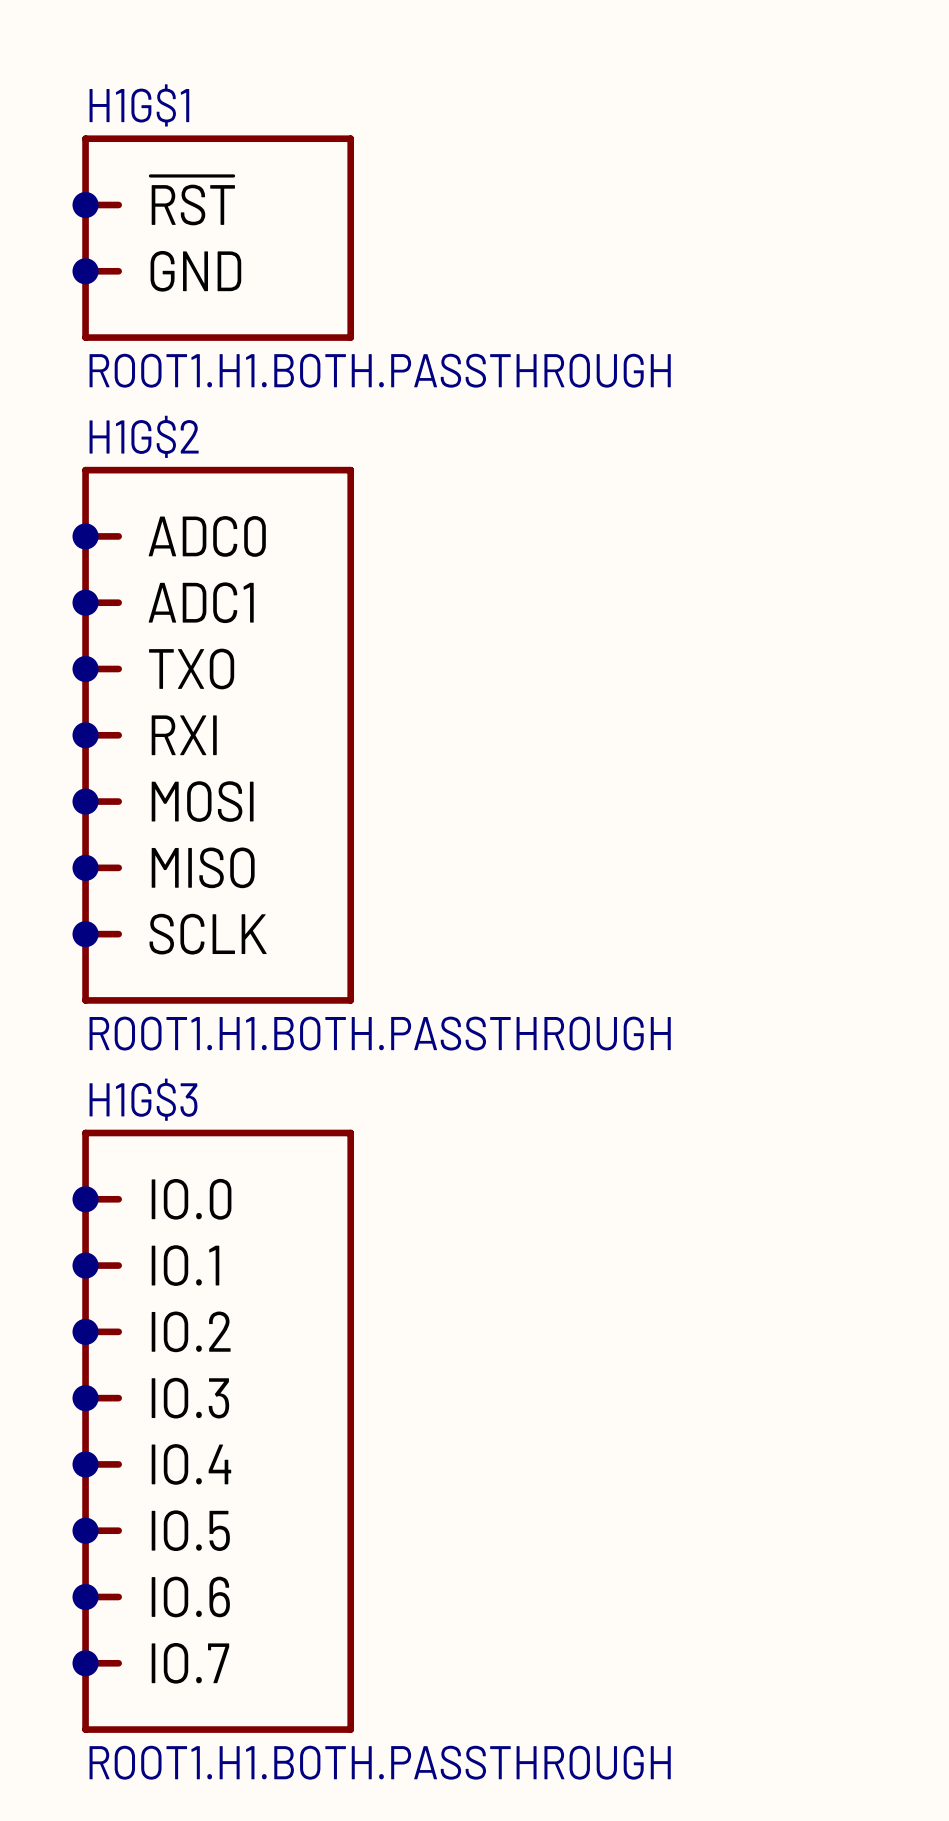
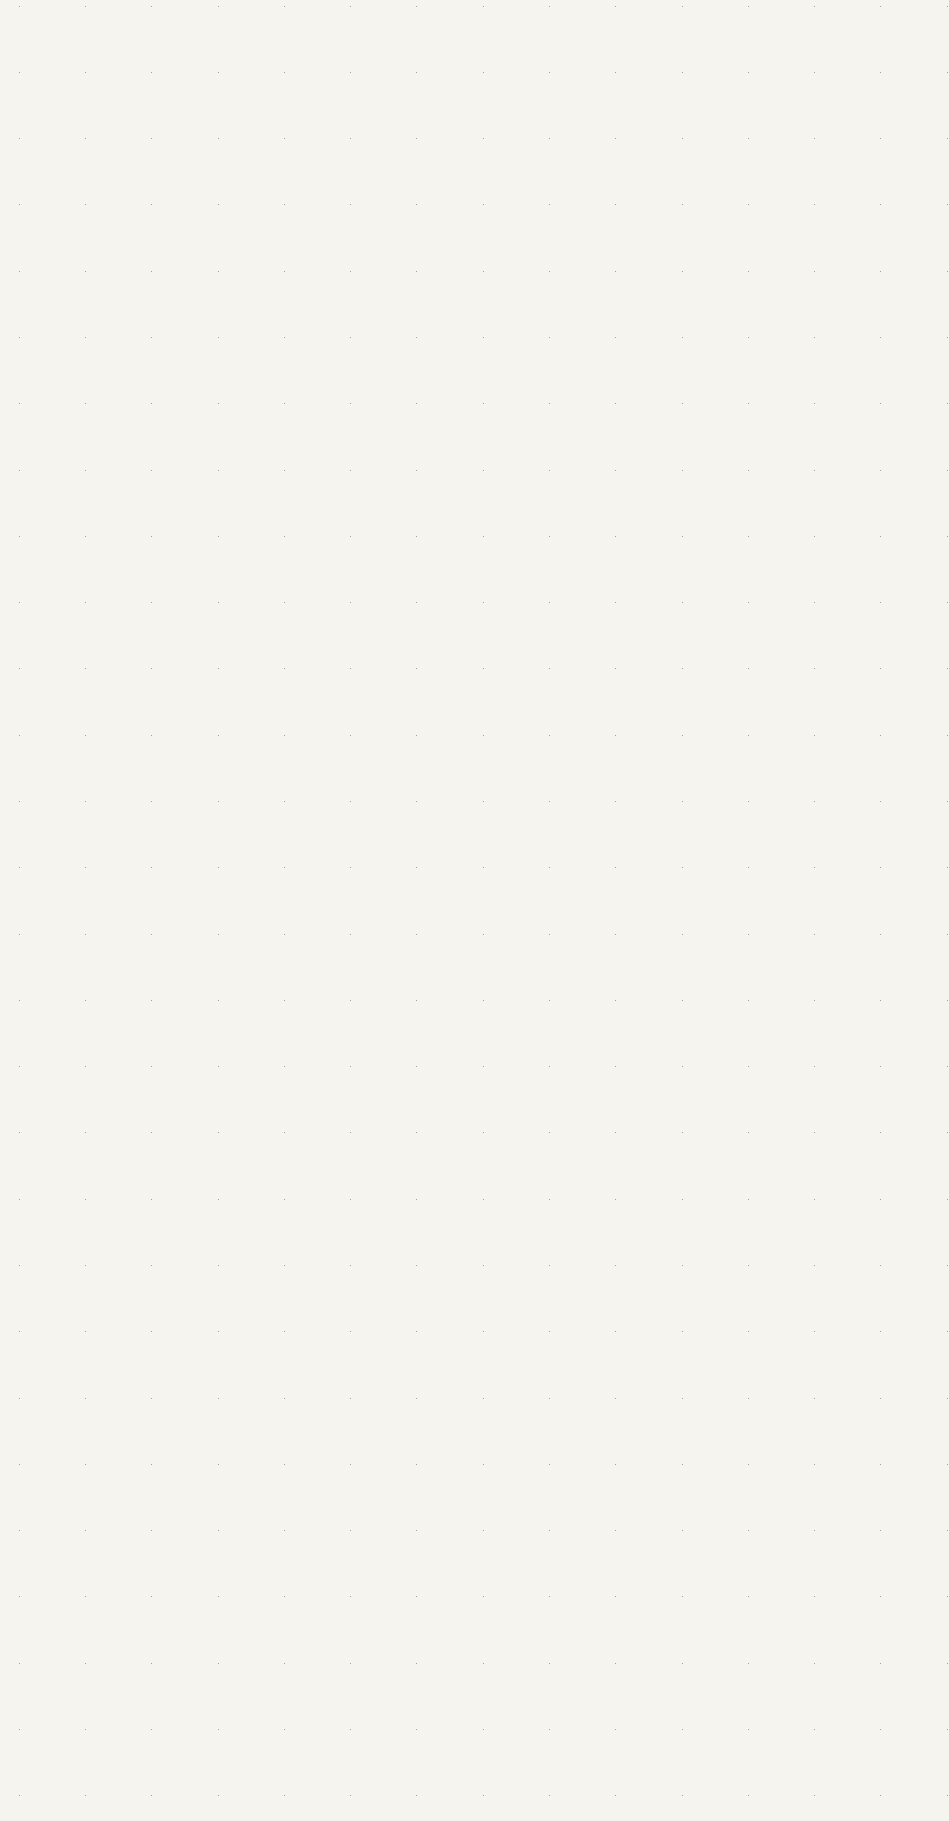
junction: (85, 204) -> none
H1G$1: ROOT1.H1.BOTH.PASSTHROUGH (218, 238) -> none
junction: (85, 271) -> none
junction: (85, 536) -> none
junction: (85, 602) -> none
junction: (85, 668) -> none
junction: (85, 735) -> none
H1G$2: ROOT1.H1.BOTH.PASSTHROUGH (218, 735) -> none
junction: (85, 801) -> none
junction: (85, 867) -> none
junction: (85, 934) -> none
junction: (85, 1199) -> none
junction: (85, 1265) -> none
junction: (85, 1331) -> none
junction: (85, 1398) -> none
H1G$3: ROOT1.H1.BOTH.PASSTHROUGH (218, 1431) -> none
junction: (85, 1464) -> none
junction: (85, 1530) -> none
junction: (85, 1596) -> none
junction: (85, 1663) -> none

